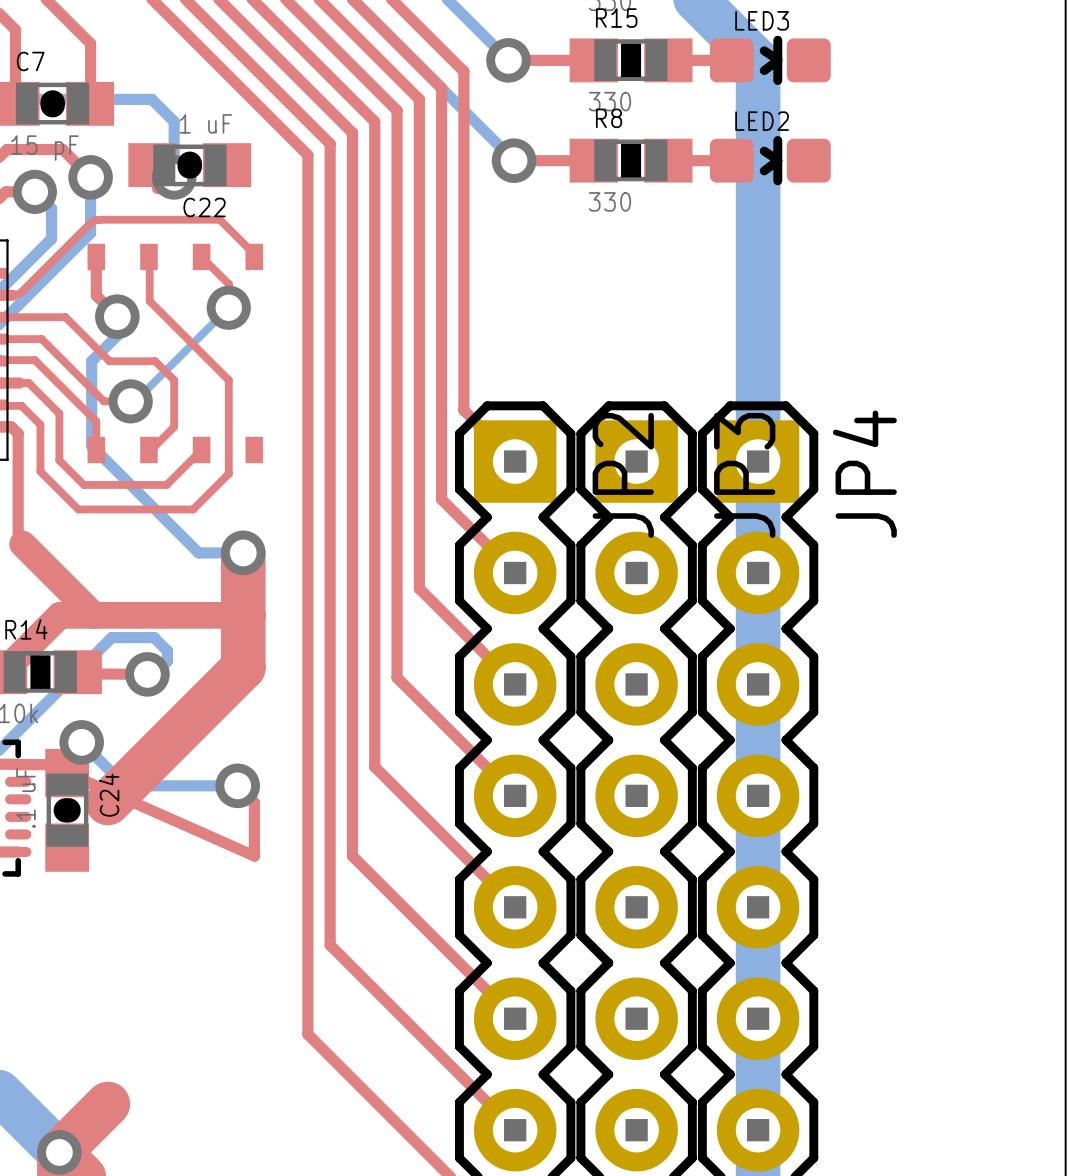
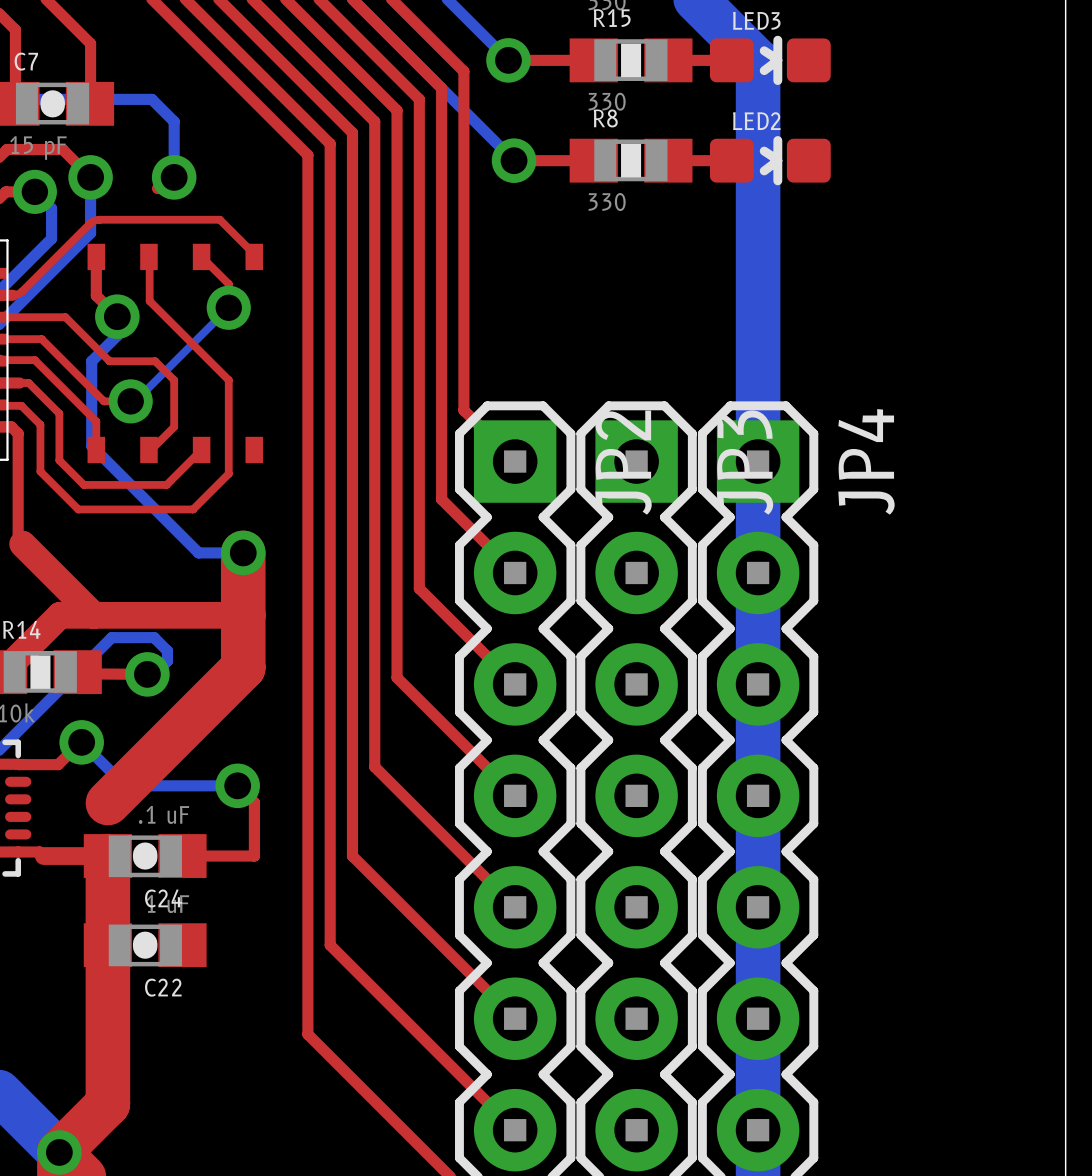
C22 position: (189, 165) -> (145, 945)
top track: (67, 773) (254, 856) -> (182, 856) (254, 856)
C24 rotation: 0° (67, 810) -> 90° clockwise (145, 856)
C24 position: (67, 810) -> (145, 856)
top track: none -> (18, 851) (39, 851) (43, 856) (107, 856) (107, 1103)

